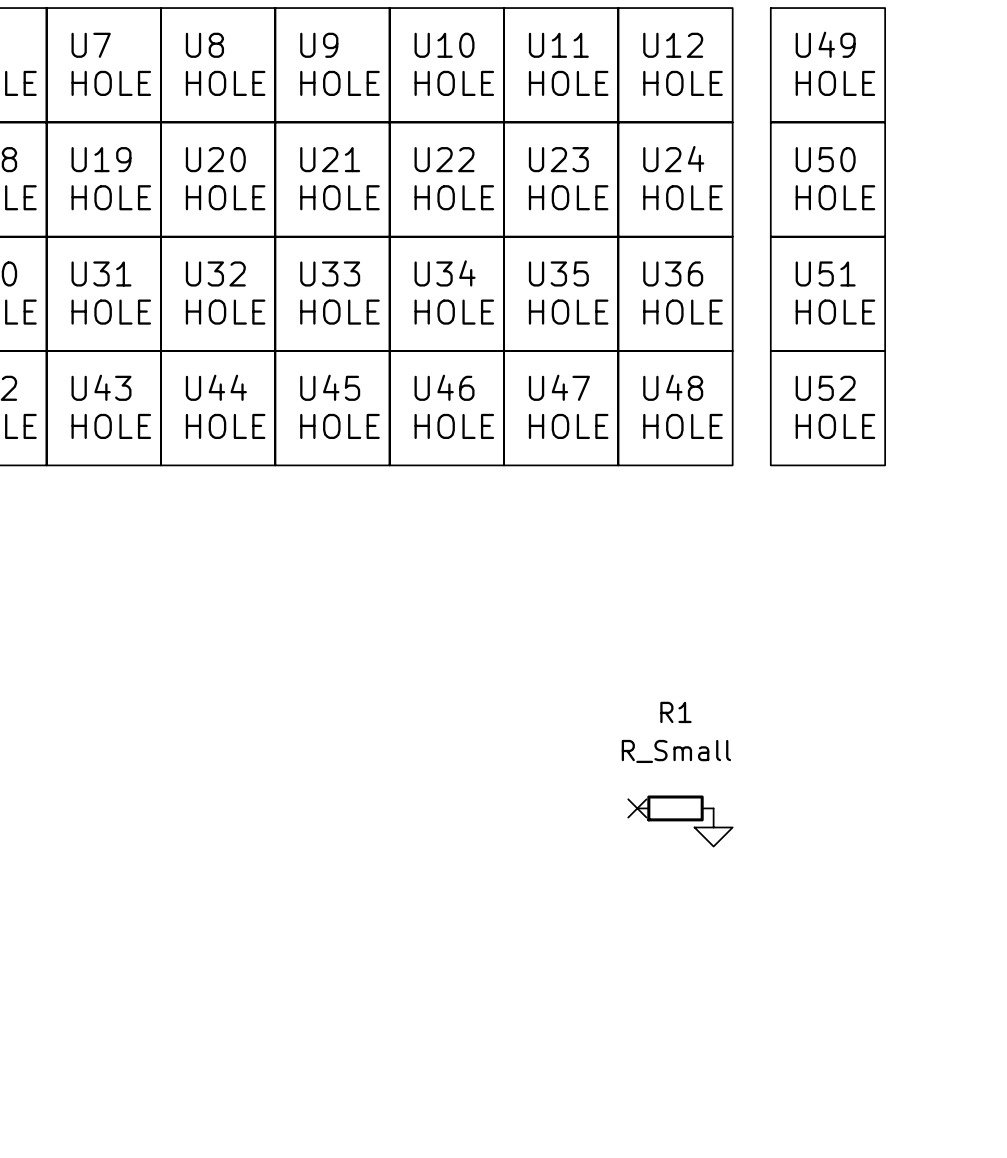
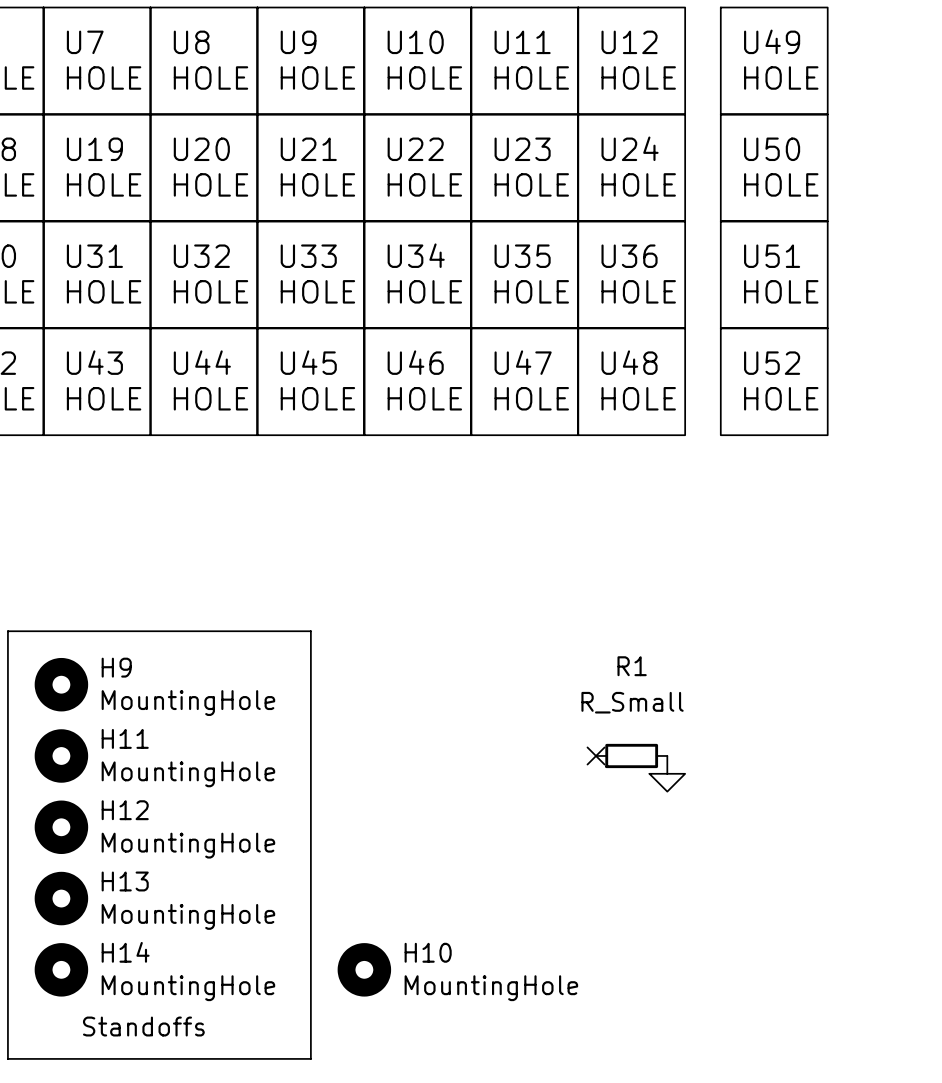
line: none -> (7, 631) (7, 1058) (310, 1058) (310, 631) (7, 631)
H9: none -> MountingHole (61, 684)
H11: none -> MountingHole (61, 755)
H12: none -> MountingHole (61, 827)
H13: none -> MountingHole (61, 898)
H14: none -> MountingHole (61, 969)
H10: none -> MountingHole (364, 969)
text: none -> Standoffs (143, 1026)

